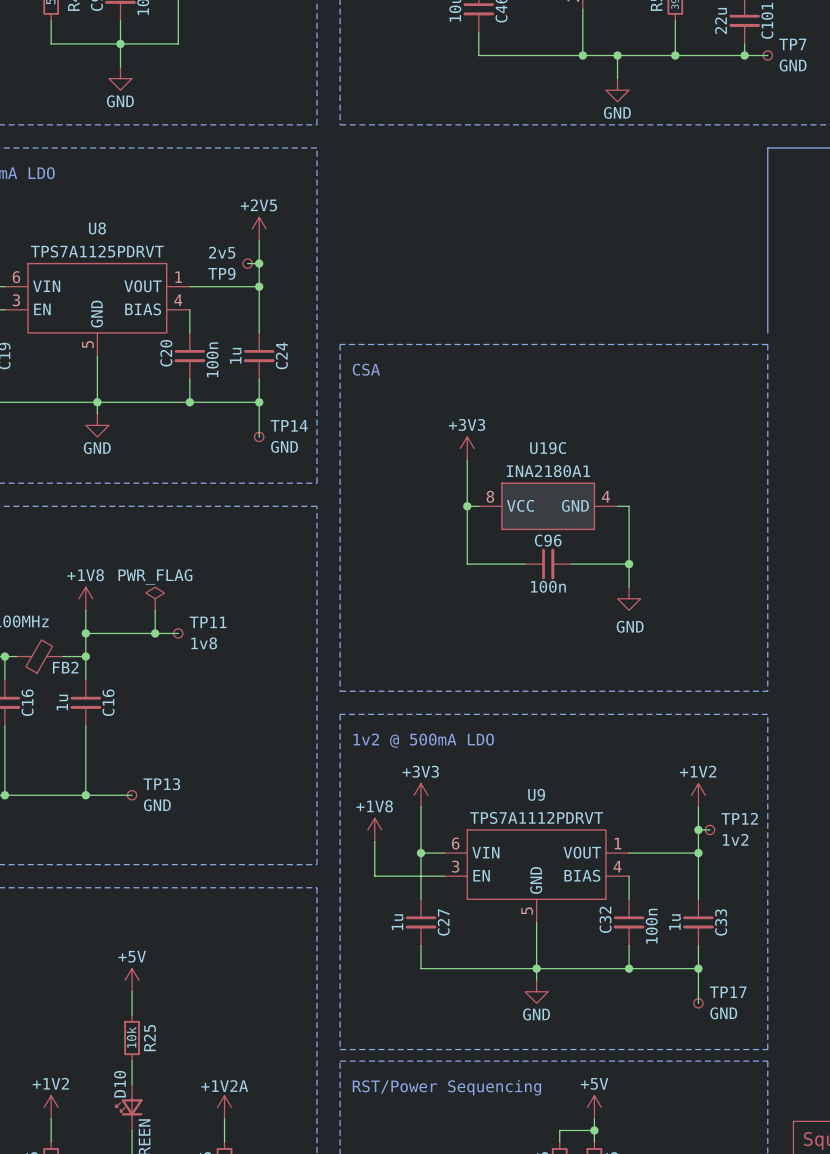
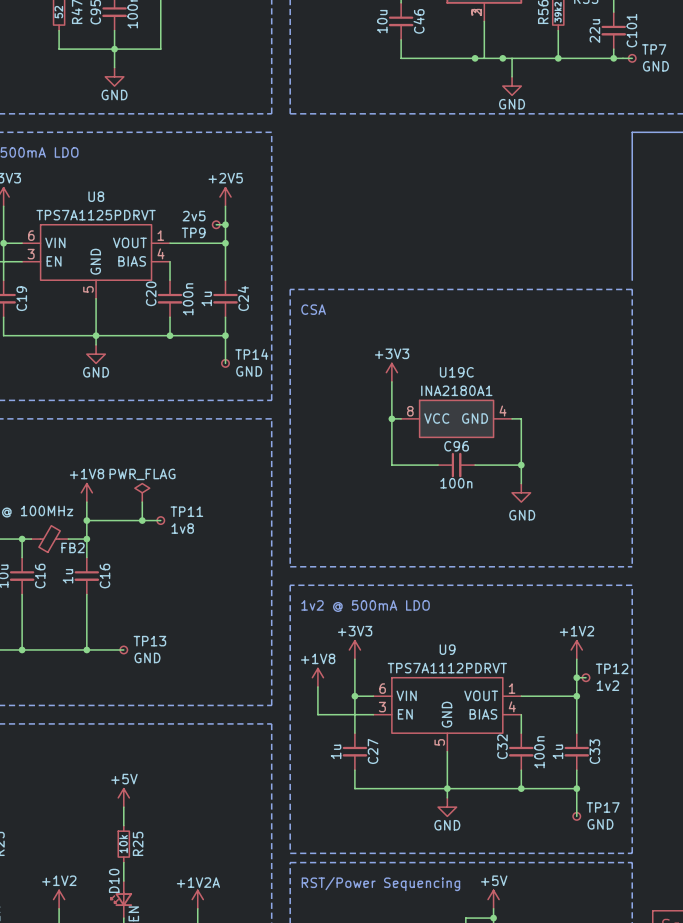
junction: none -> (475, 58)
junction: (582, 55) -> none
junction: none -> (502, 58)
junction: (617, 55) -> none

